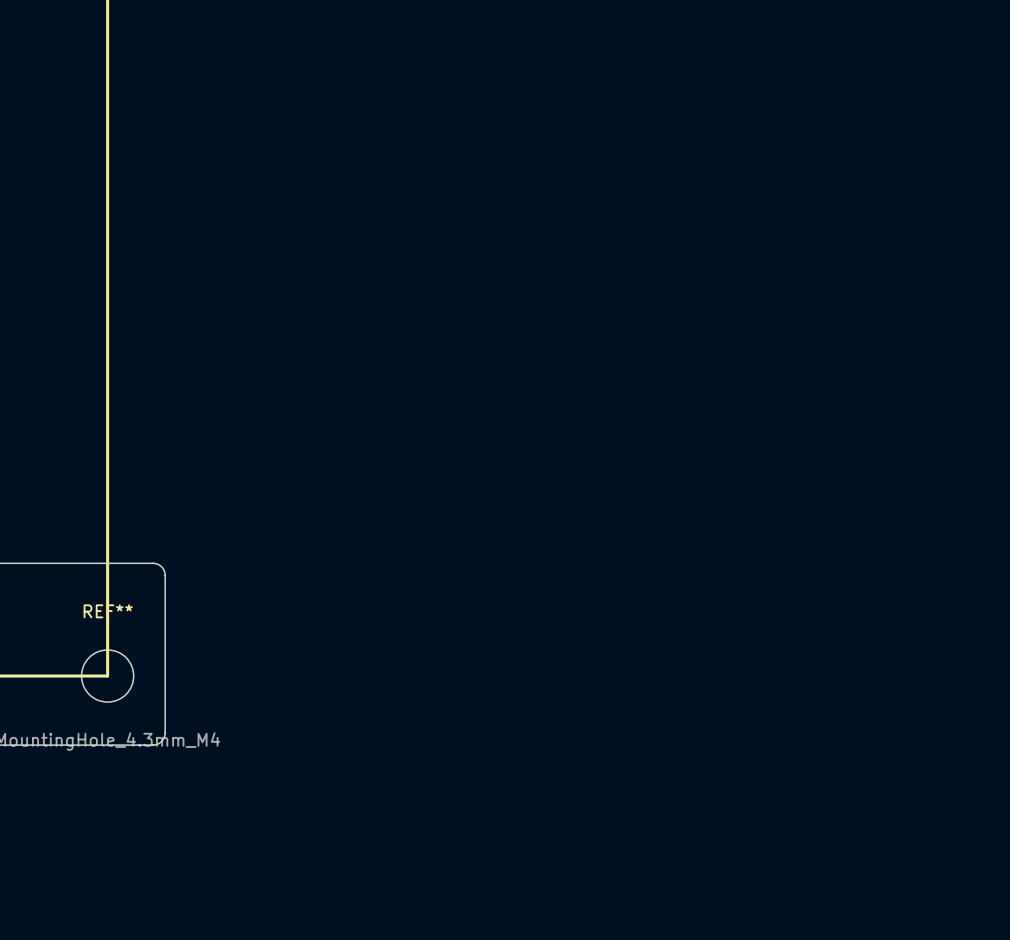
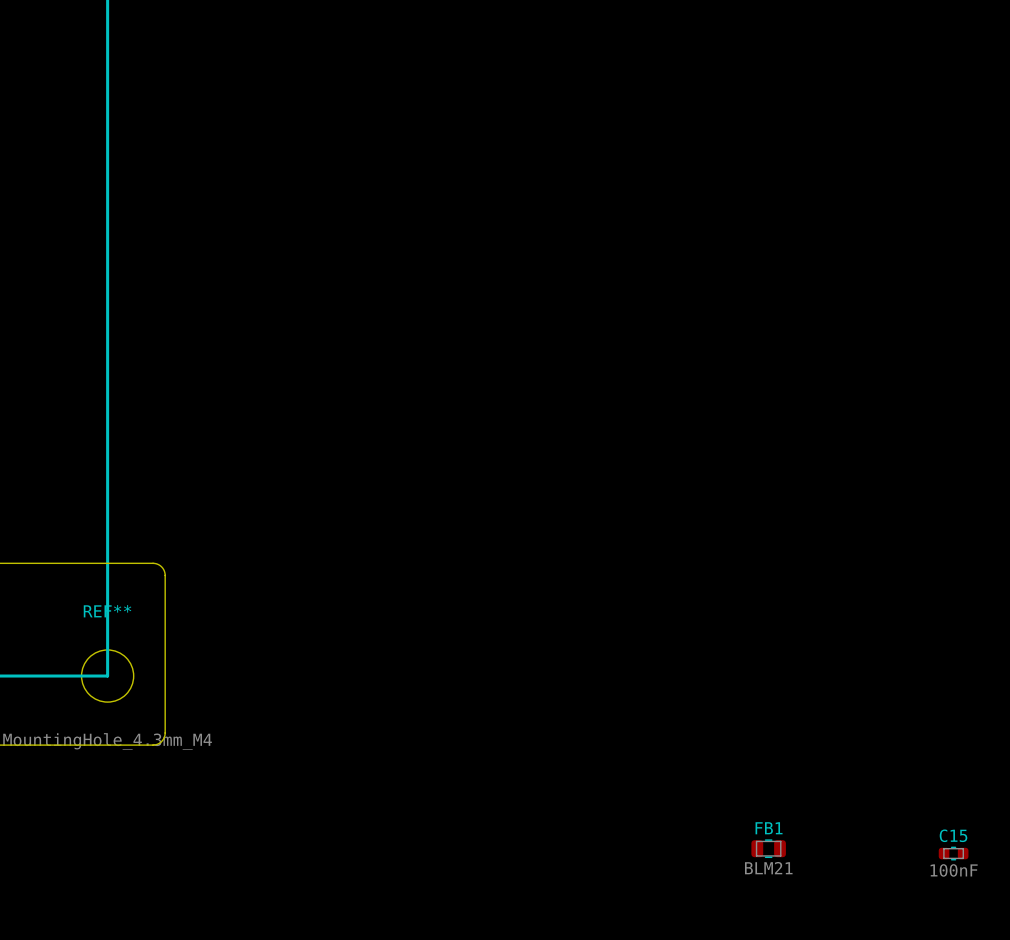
FB1: none -> BLM21 (768, 848)
C15: none -> 100nF (953, 853)

